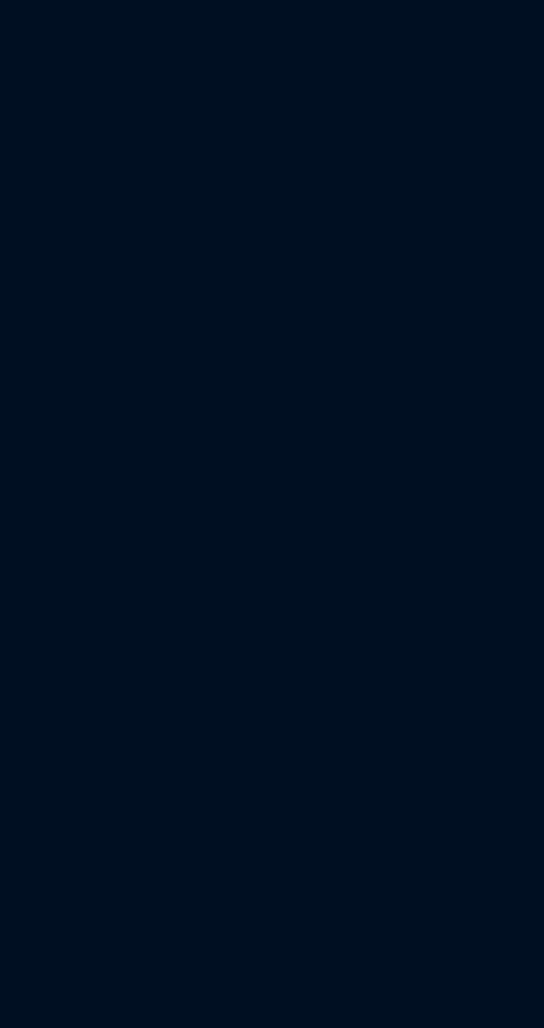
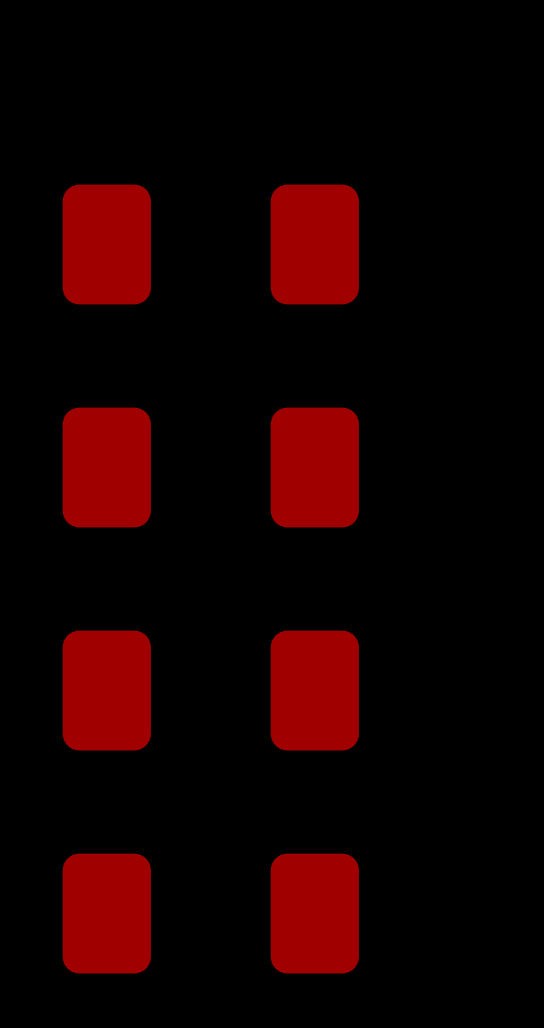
part: none -> (210, 244)
part: none -> (210, 467)
part: none -> (210, 690)
part: none -> (210, 913)

